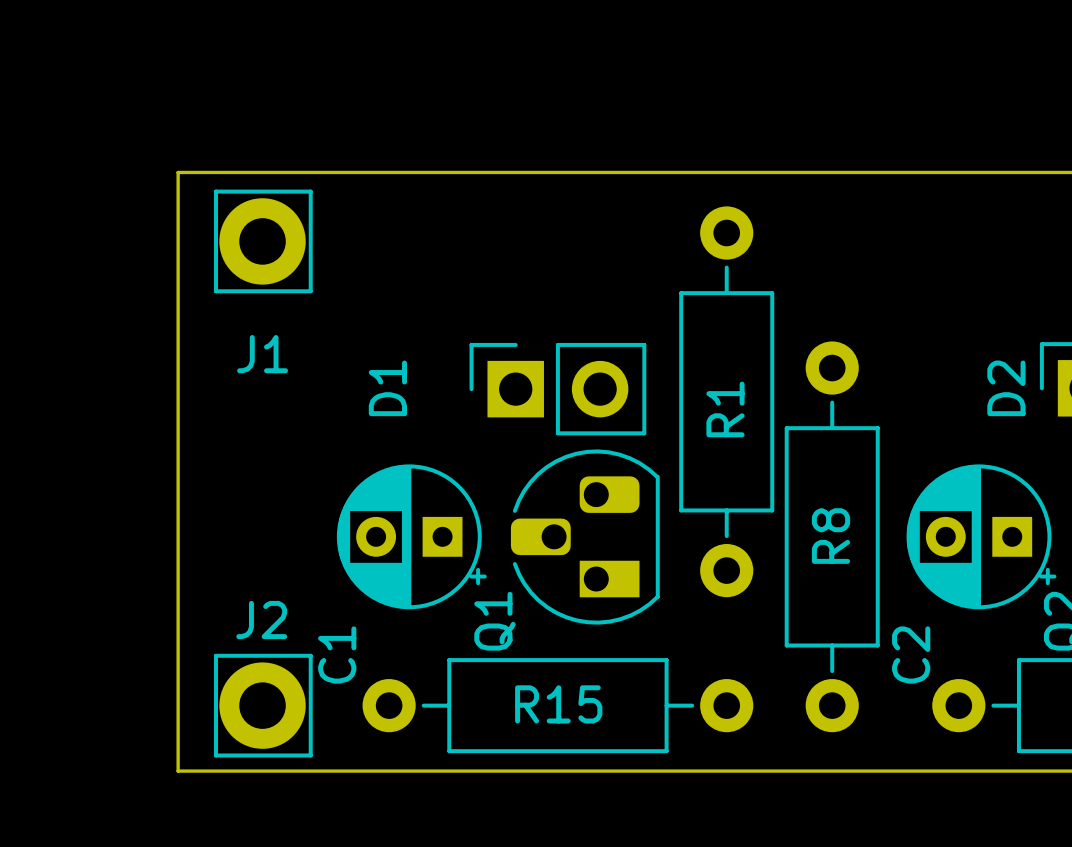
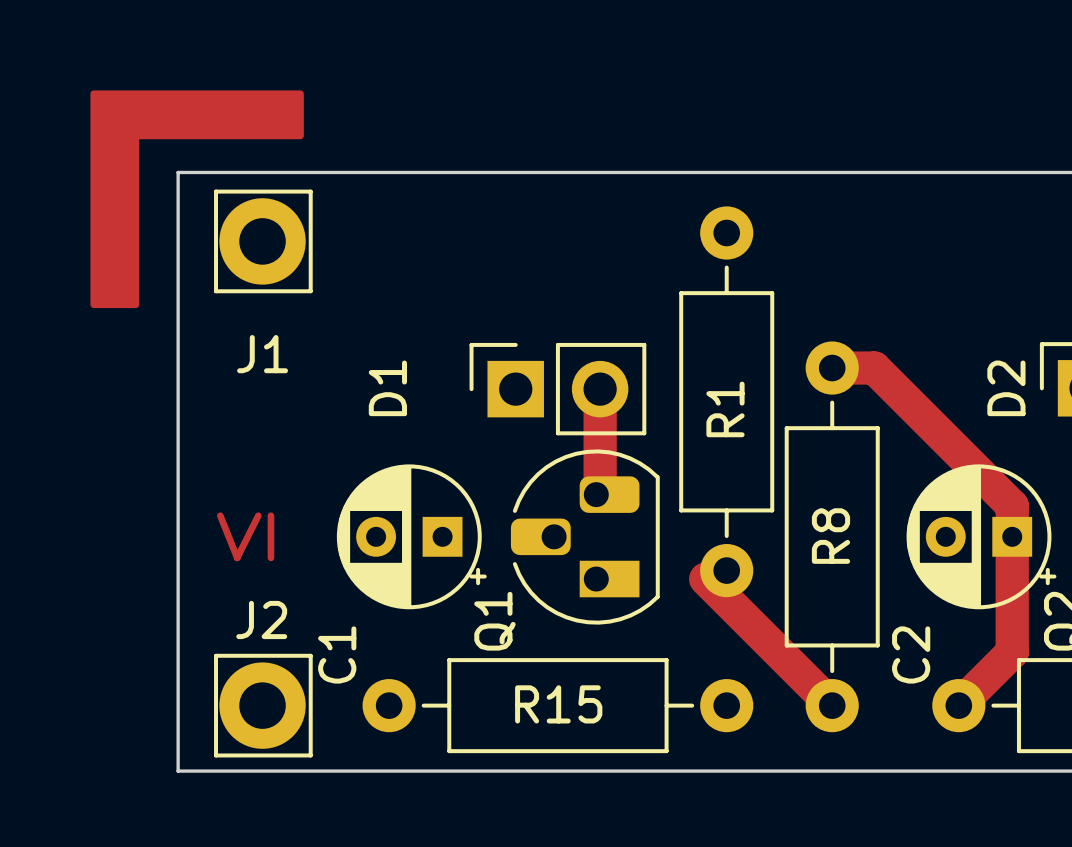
drawing: none -> [90, 90, 304, 309]
track: none -> (832, 368) (874, 368) (1012, 505) (1012, 652) (958, 705)
track: none -> (600, 389) (600, 490) (596, 494)
track: none -> (220, 515) (237, 557) (258, 515)
track: none -> (270, 515) (270, 557)
track: none -> (705, 579) (832, 705)

